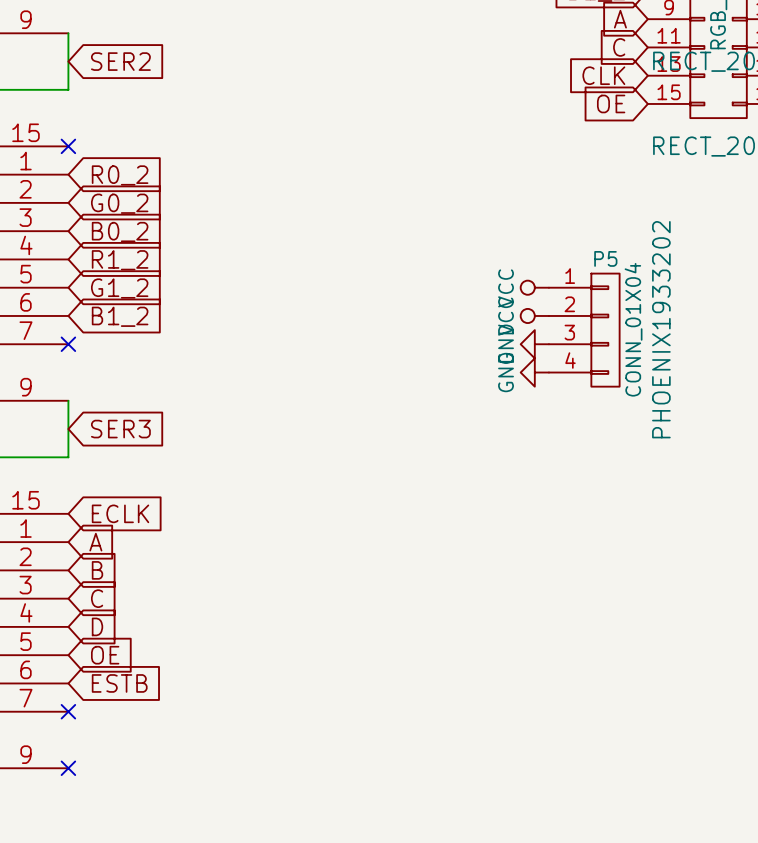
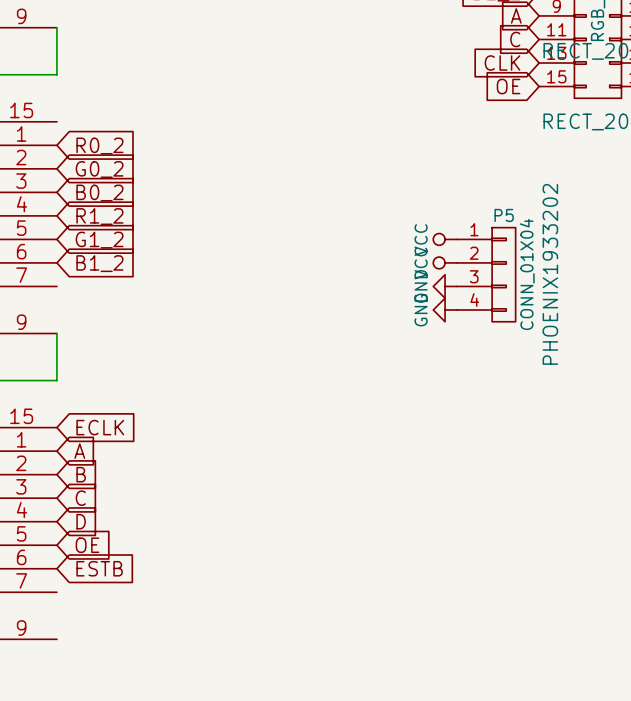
global label: SER2 (120, 61) -> none
no-connect mark: (68, 146) -> none
no-connect mark: (68, 344) -> none
global label: SER3 (120, 429) -> none
no-connect mark: (68, 711) -> none
no-connect mark: (68, 768) -> none

